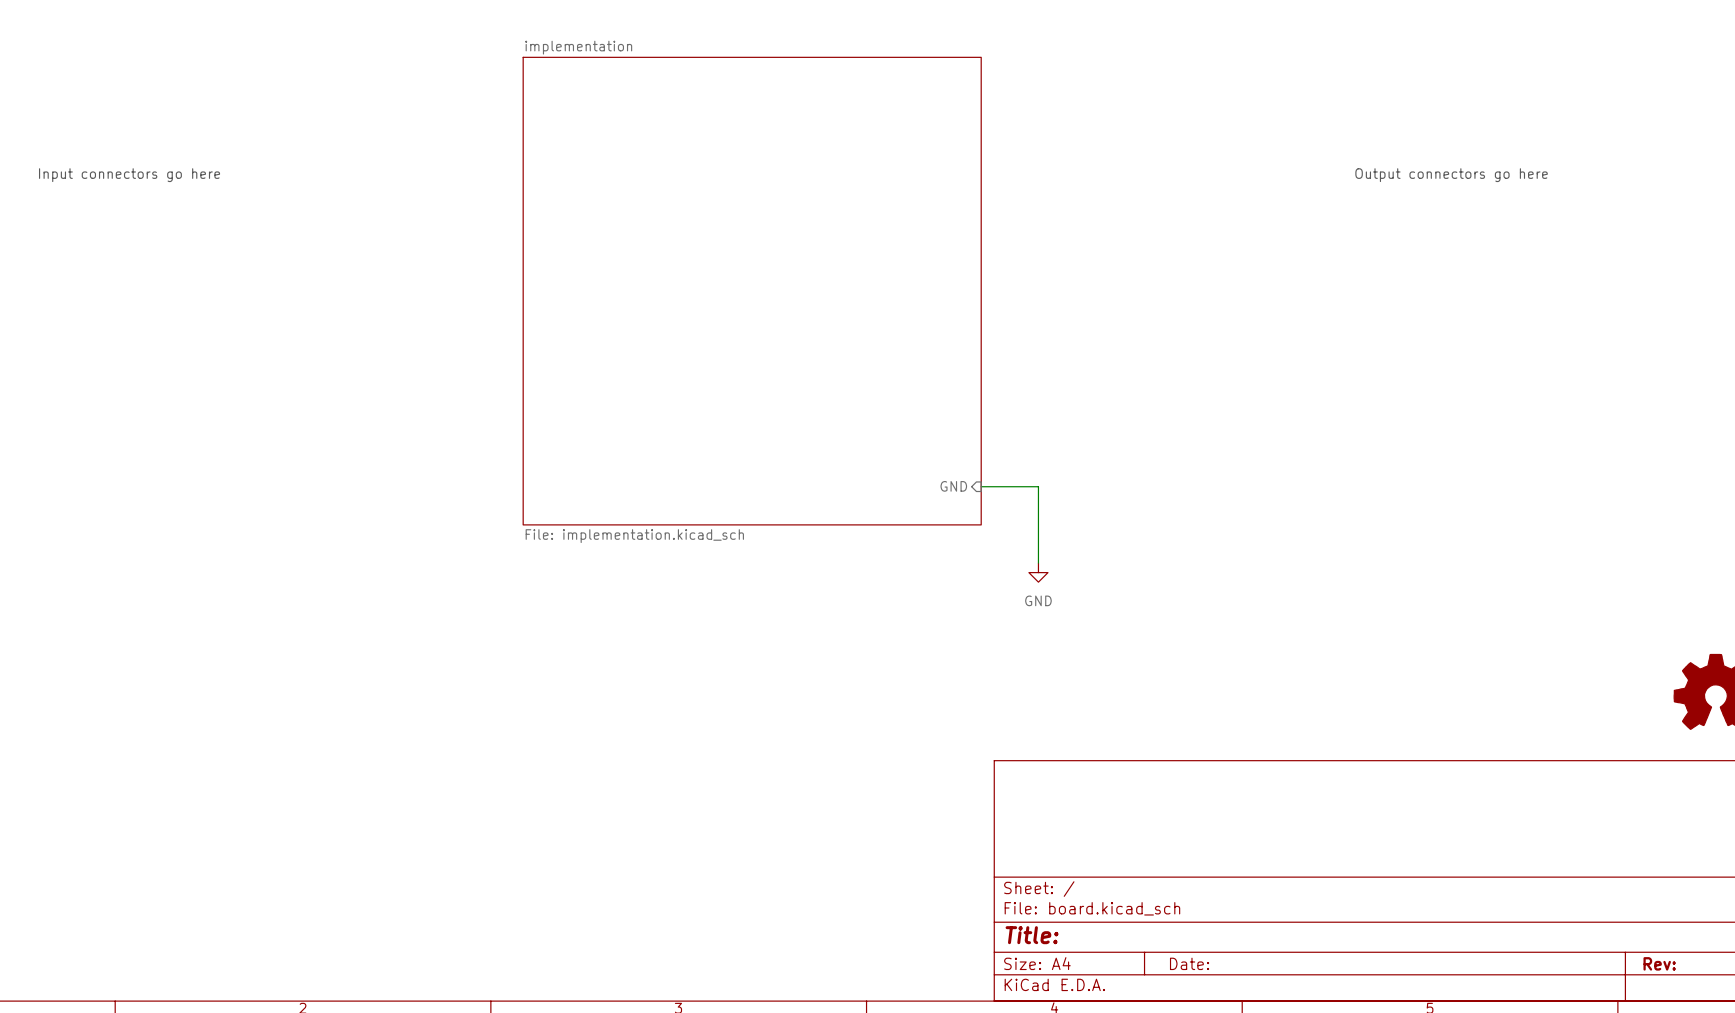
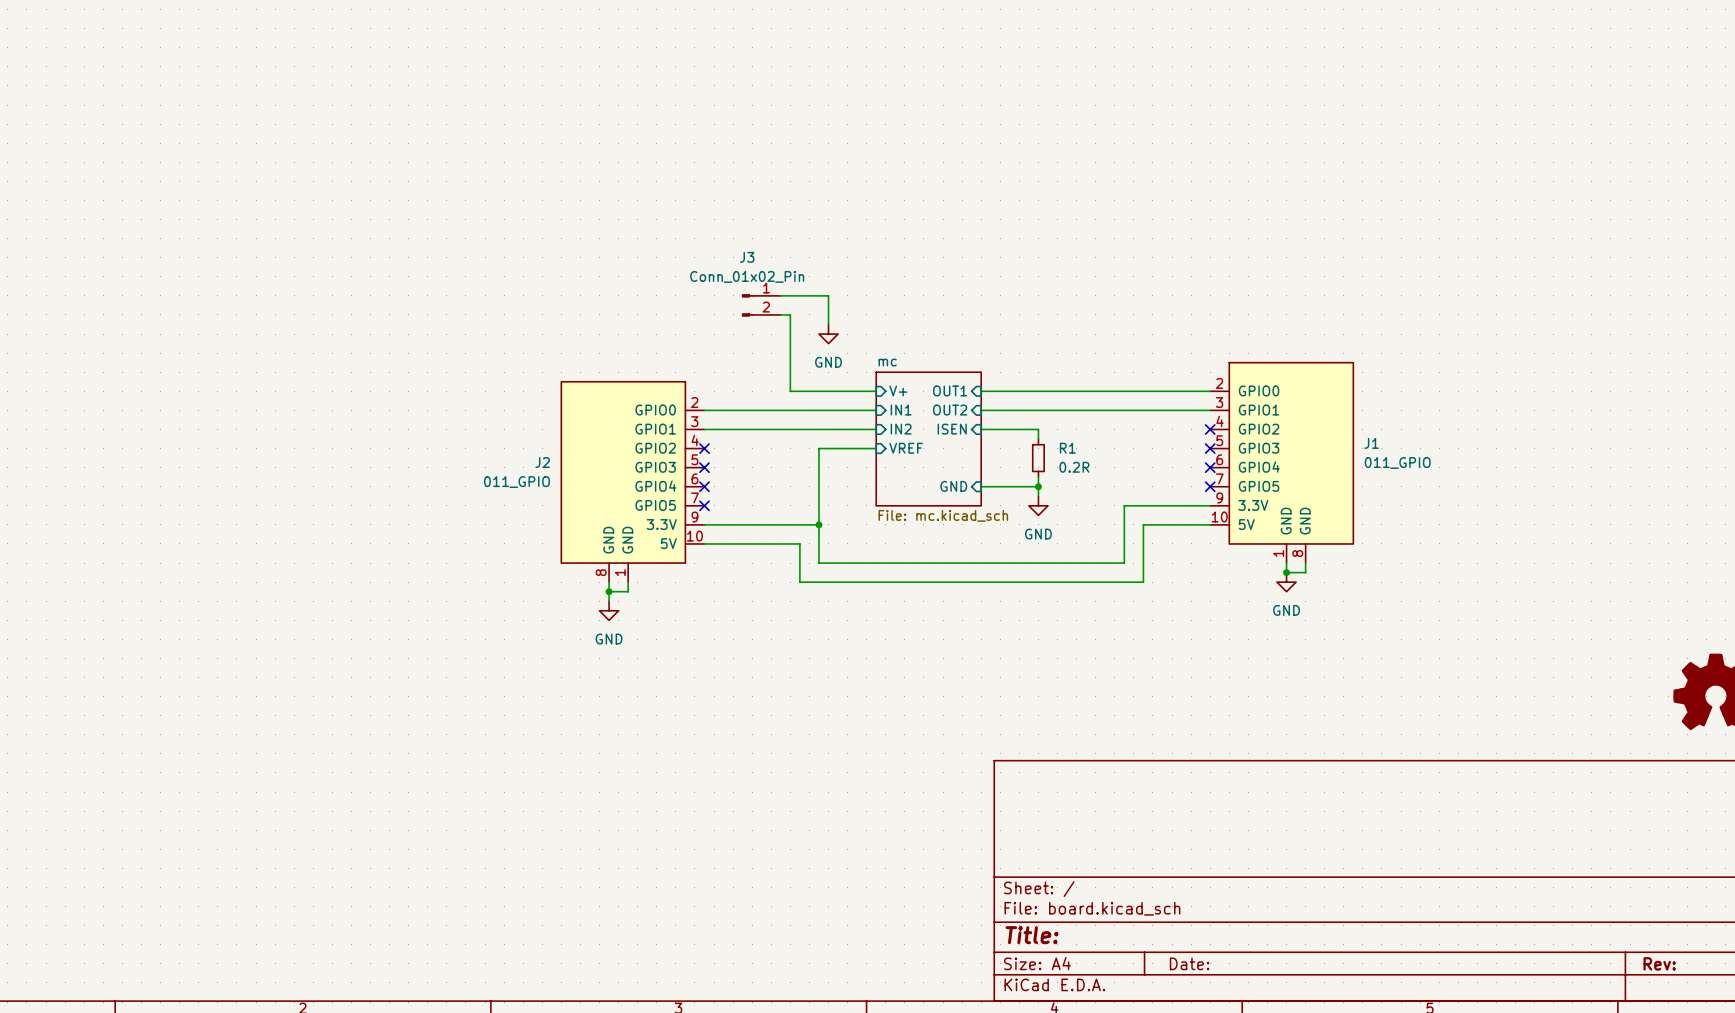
text: Input connectors go here (129, 175) -> none
text: Output connectors go here (1451, 175) -> none
sheet implementation: File: implementation.kicad_sch (752, 291) -> none
wire: none -> (780, 295) (828, 295) (828, 324)
J3: none -> Conn_01x02_Pin (761, 305)
wire: none -> (780, 314) (790, 314) (790, 391) (876, 391)
power symbol: none -> GND (828, 334)
sheet pin: none -> V+ (898, 390)
sheet pin: none -> OUT1 (950, 390)
wire: none -> (981, 391) (1210, 391)
wire: none -> (704, 410) (876, 410)
sheet pin: none -> IN1 (901, 410)
sheet pin: none -> OUT2 (950, 410)
wire: none -> (981, 410) (1210, 410)
wire: none -> (704, 429) (876, 429)
sheet pin: none -> IN2 (901, 429)
sheet pin: none -> ISEN (952, 429)
wire: none -> (981, 429) (1038, 429) (1038, 439)
no-connect mark: none -> (1210, 429)
sheet mc: none -> File: mc.kicad_sch (928, 439)
no-connect mark: none -> (704, 448)
wire: none -> (876, 448) (818, 448) (818, 563) (1124, 563) (1124, 505) (1210, 505)
sheet pin: none -> VREF (906, 448)
no-connect mark: none -> (1210, 448)
R1: none -> 0.2R (1038, 458)
J1: none -> 011_GPIO (1281, 462)
no-connect mark: none -> (704, 467)
no-connect mark: none -> (1210, 467)
wire: none -> (1038, 477) (1038, 486)
J2: none -> 011_GPIO (632, 481)
no-connect mark: none -> (704, 486)
junction: none -> (1038, 486)
no-connect mark: none -> (1210, 486)
wire: (1038, 496) (1038, 563) -> none
no-connect mark: none -> (704, 505)
junction: none -> (818, 524)
wire: none -> (1210, 524) (1143, 524) (1143, 582) (799, 582) (799, 543) (704, 543)
wire: none -> (1286, 563) (1286, 572) (1305, 572) (1305, 563)
power symbol position: GND (1038, 572) -> GND (1038, 505)
junction: none -> (1286, 572)
wire: none -> (609, 582) (609, 601)
wire: none -> (628, 582) (628, 591) (609, 591)
power symbol: none -> GND (1286, 582)
junction: none -> (609, 591)
power symbol: none -> GND (609, 610)

